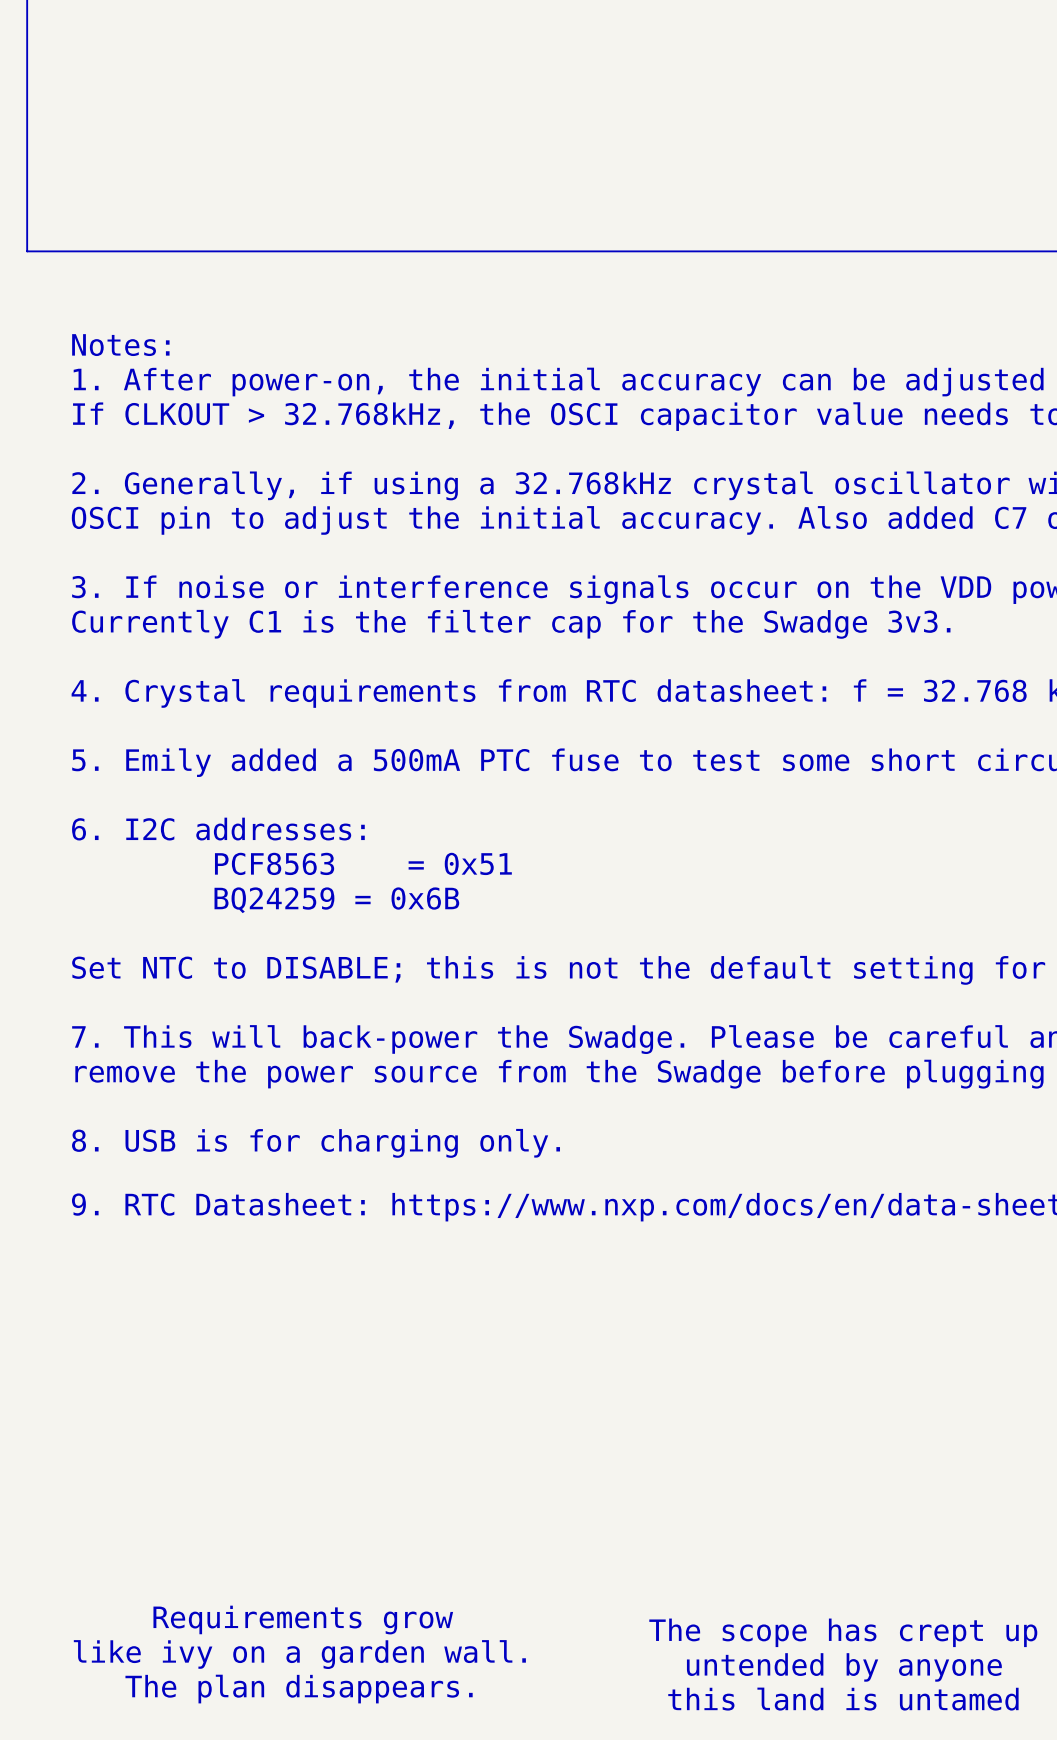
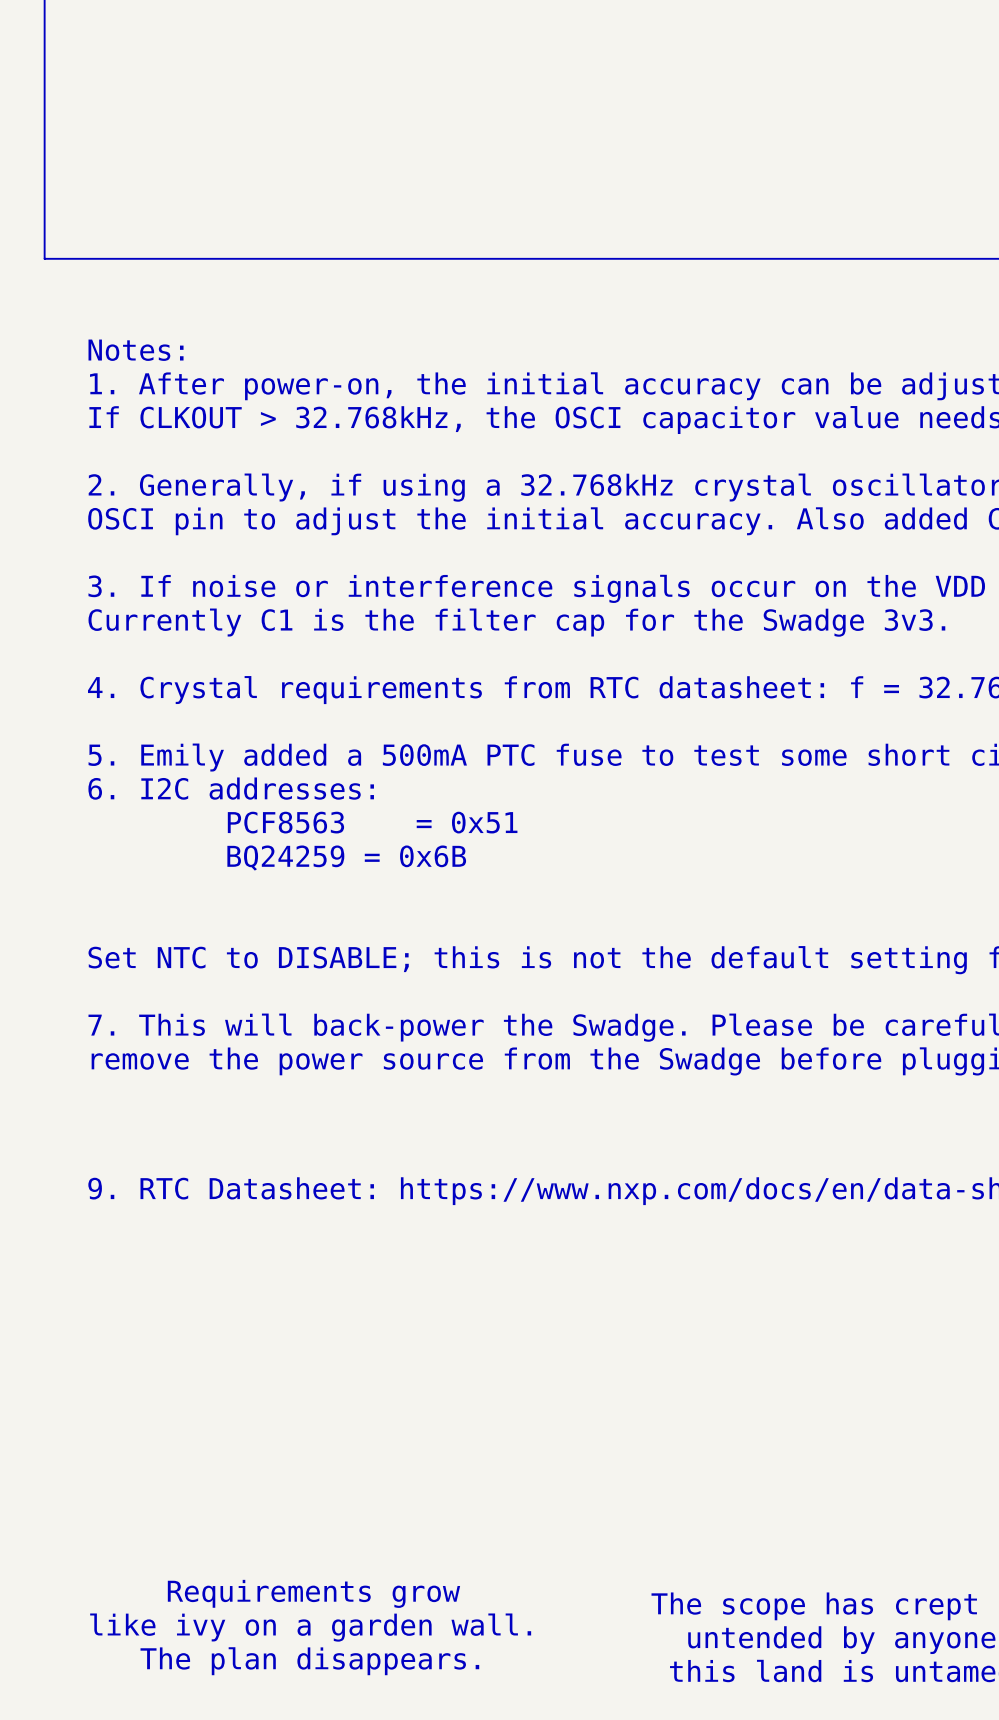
text: none -> 6. I2C addresses: (231, 788)
text: 6. I2C addresses: (218, 829) -> PCF8563 = 0x51 (372, 822)
text: PCF8563 = 0x51 (363, 863) -> BQ24259 = 0x6B (346, 858)
text: BQ24259 = 0x6B (336, 900) -> none
text: 8. USB is for charging only. (316, 1143) -> none

